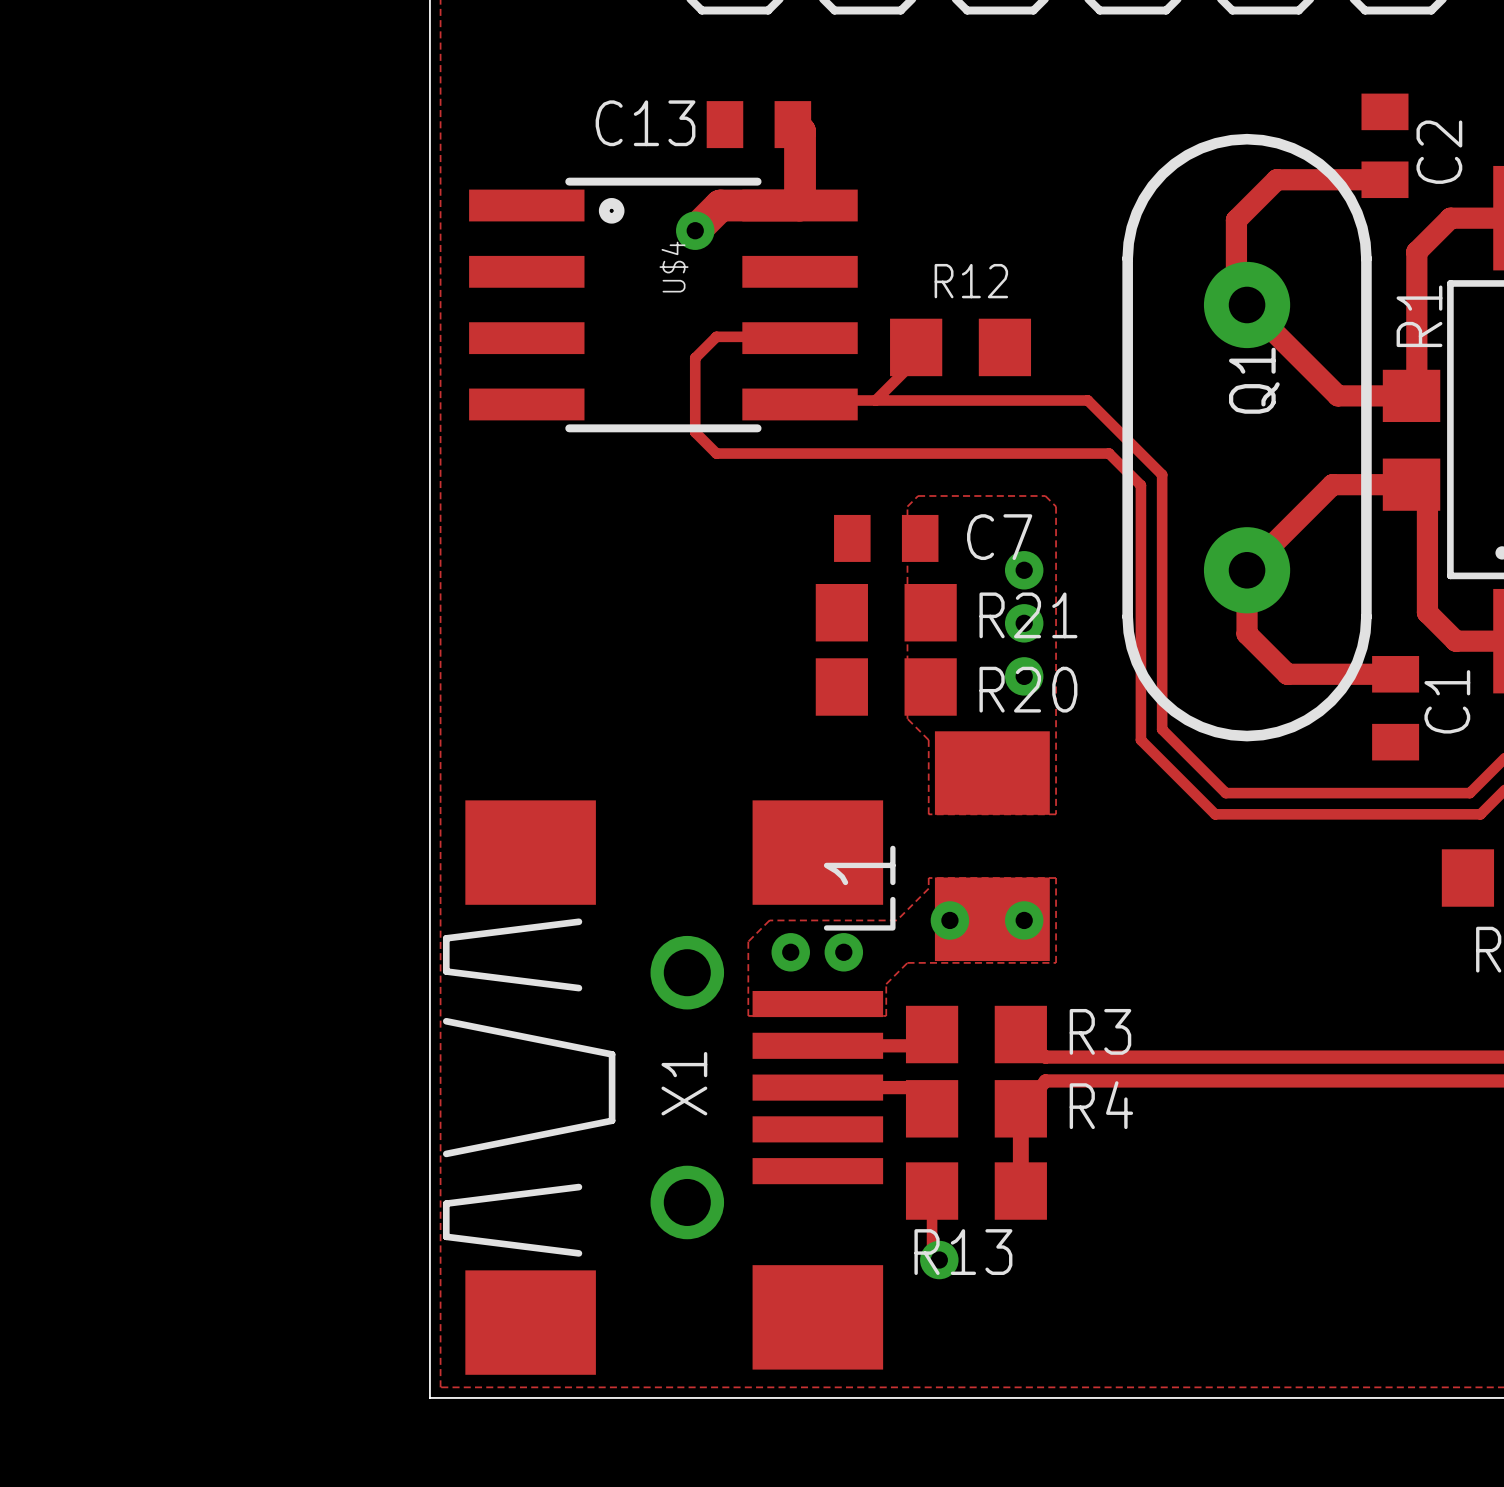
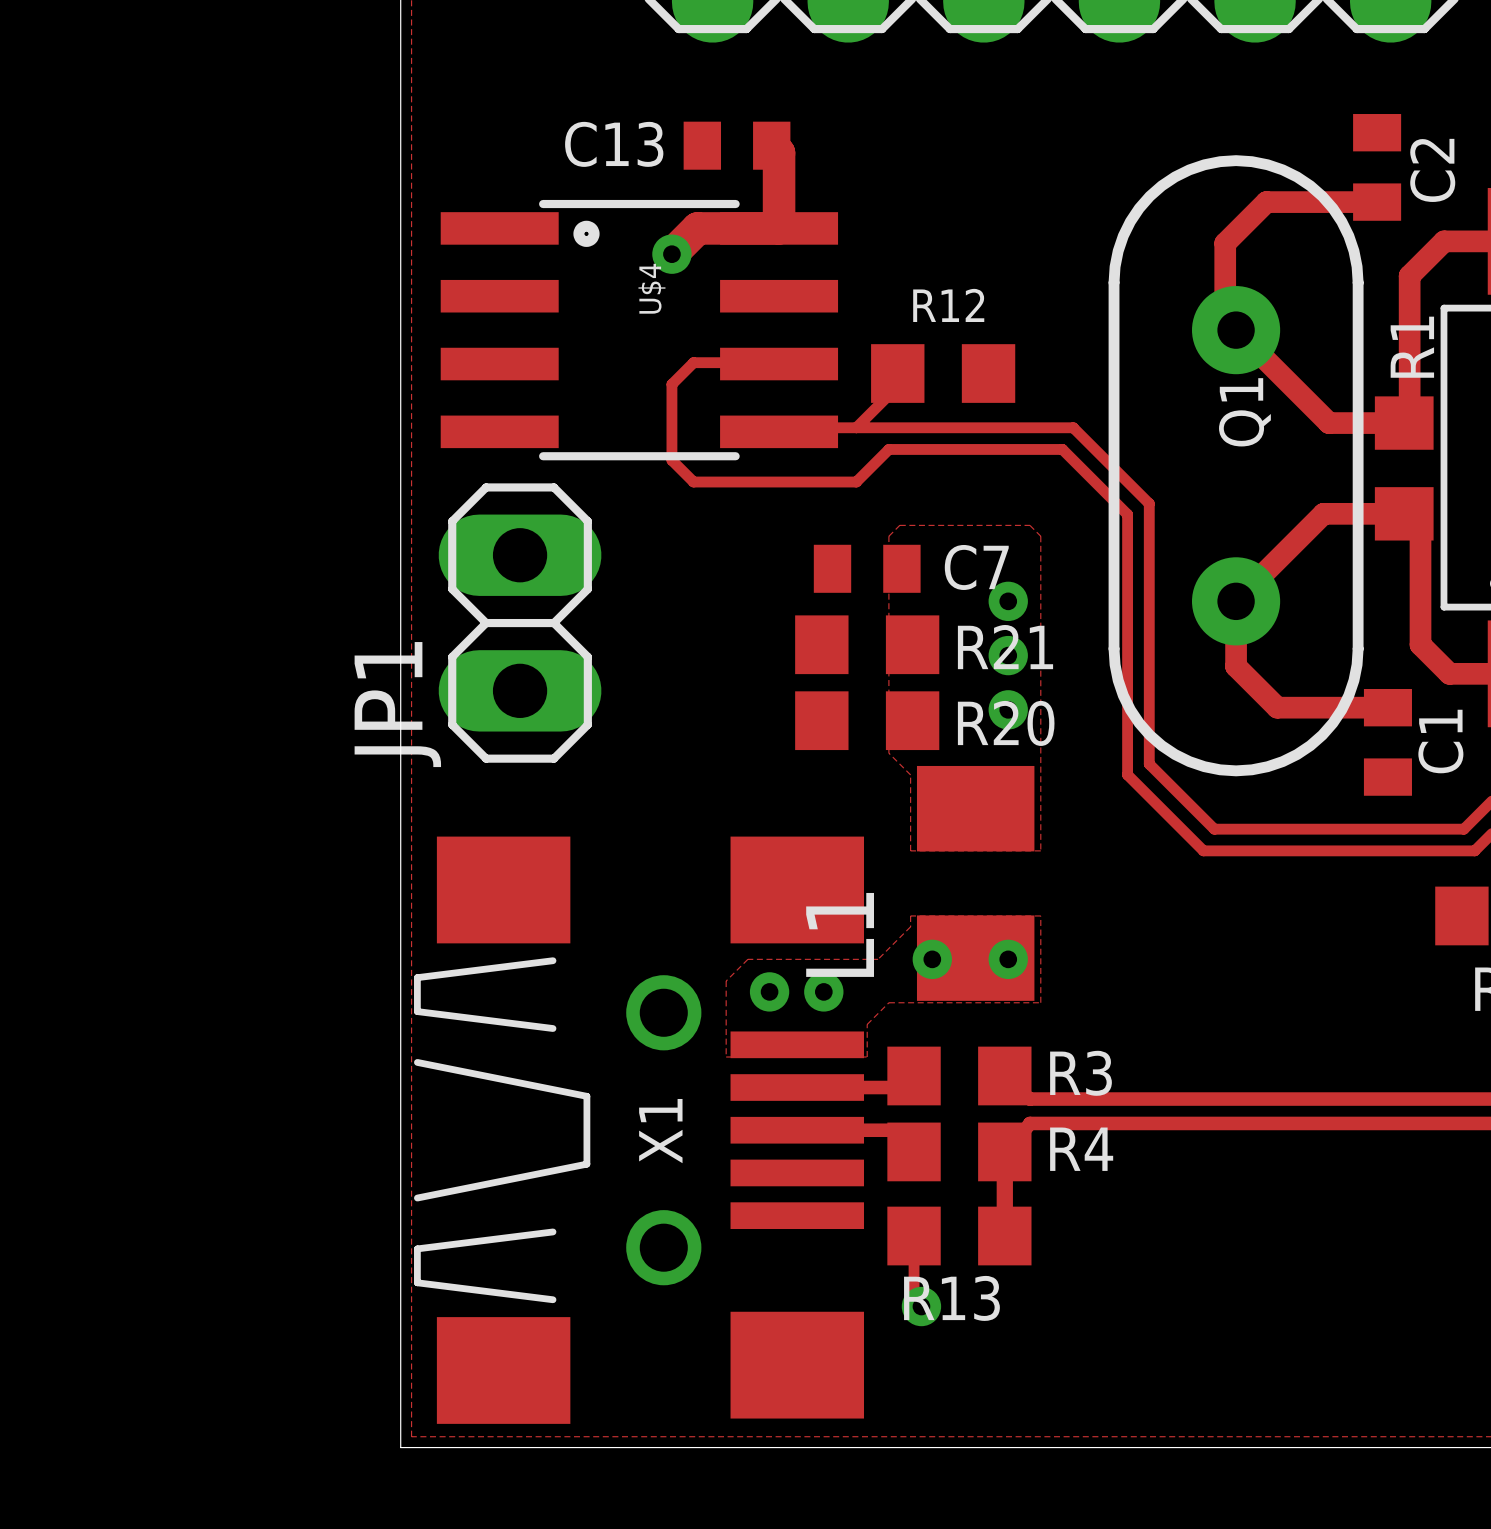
track: (875, 453) (1109, 453) -> (856, 482) (888, 449) (1062, 449) (1095, 482)
JP1: none -> (520, 623)

